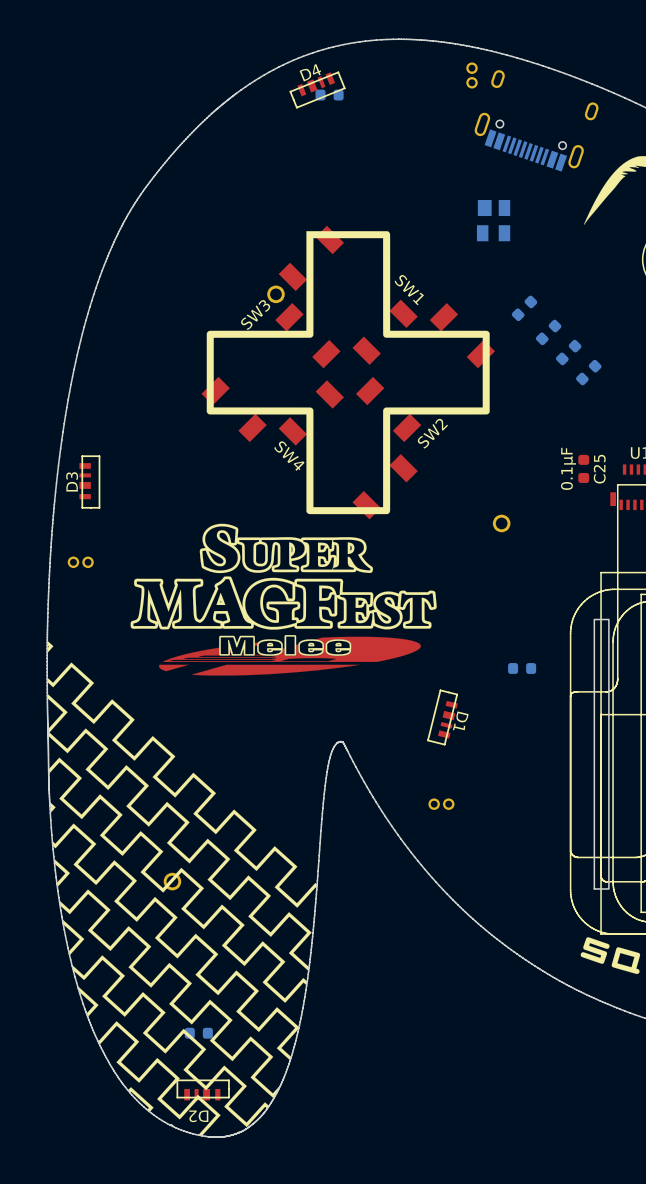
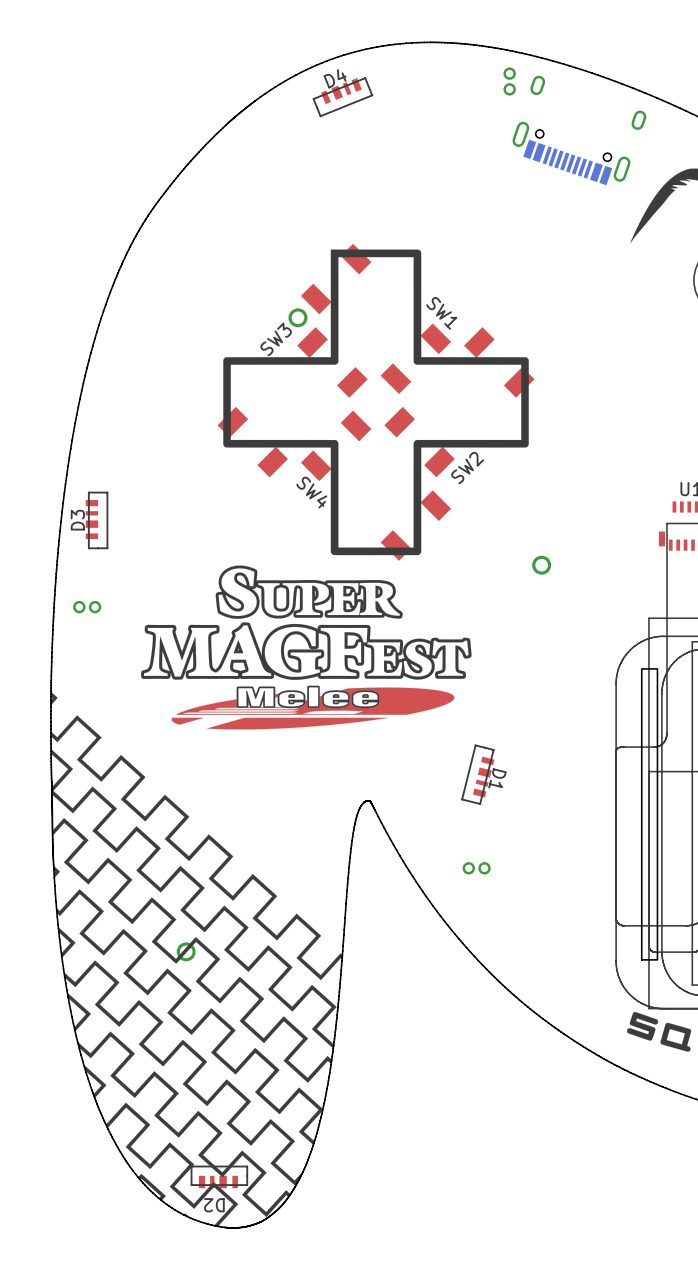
part: (329, 95) -> none
part: (493, 220) -> none
part: (524, 308) -> none
part: (548, 332) -> none
part: (568, 352) -> none
part: (588, 372) -> none
C25: 0.1μF (583, 468) -> none
part: (522, 668) -> none
part: (198, 1033) -> none

